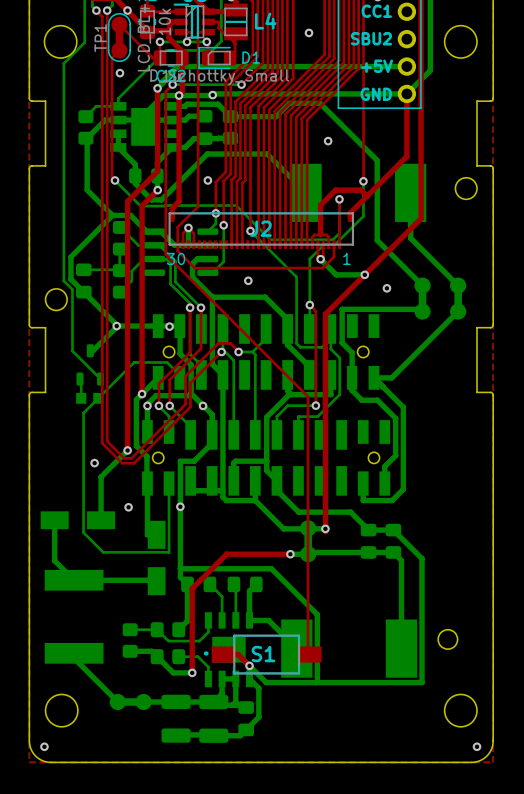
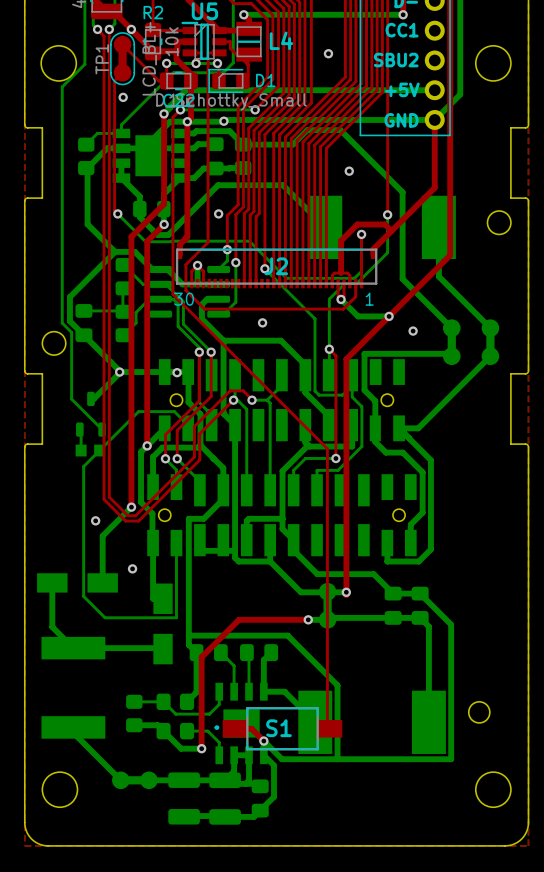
via: (147, 405) -> none
via: (203, 405) -> none
via: (180, 506) -> none
via: (44, 746) -> none
via: (477, 746) -> none

